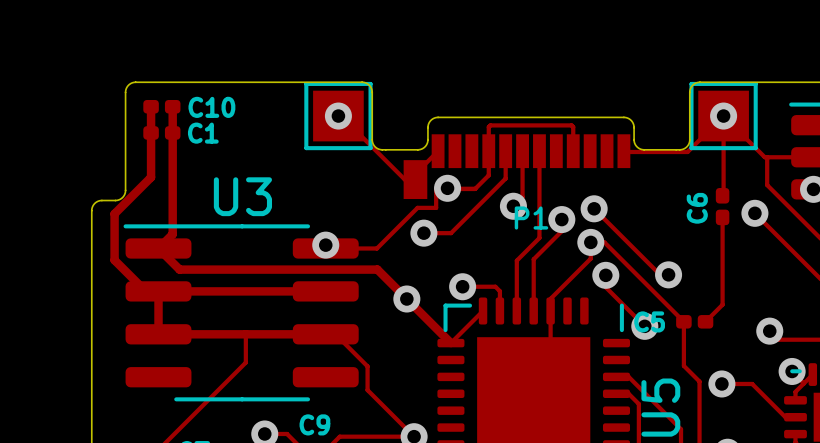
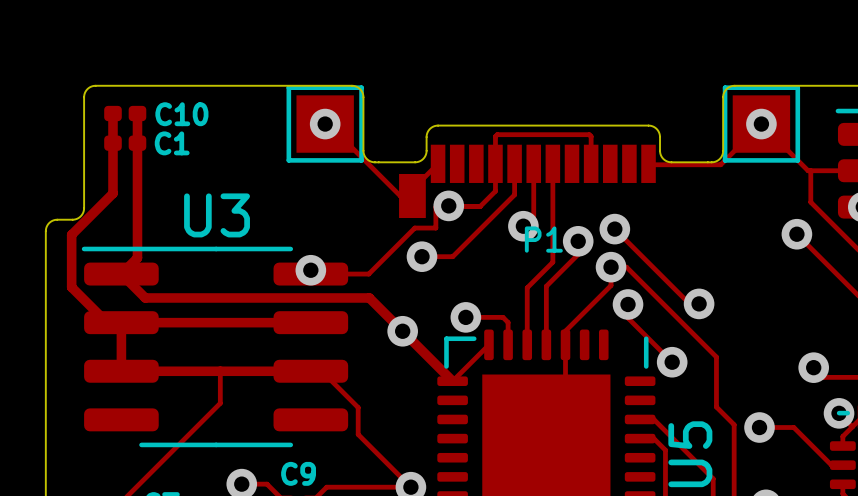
track: (723, 116) (722, 195) -> none
C6: (722, 206) -> none
track: (722, 217) (722, 304) (705, 321) -> none
C5: (694, 321) -> none

